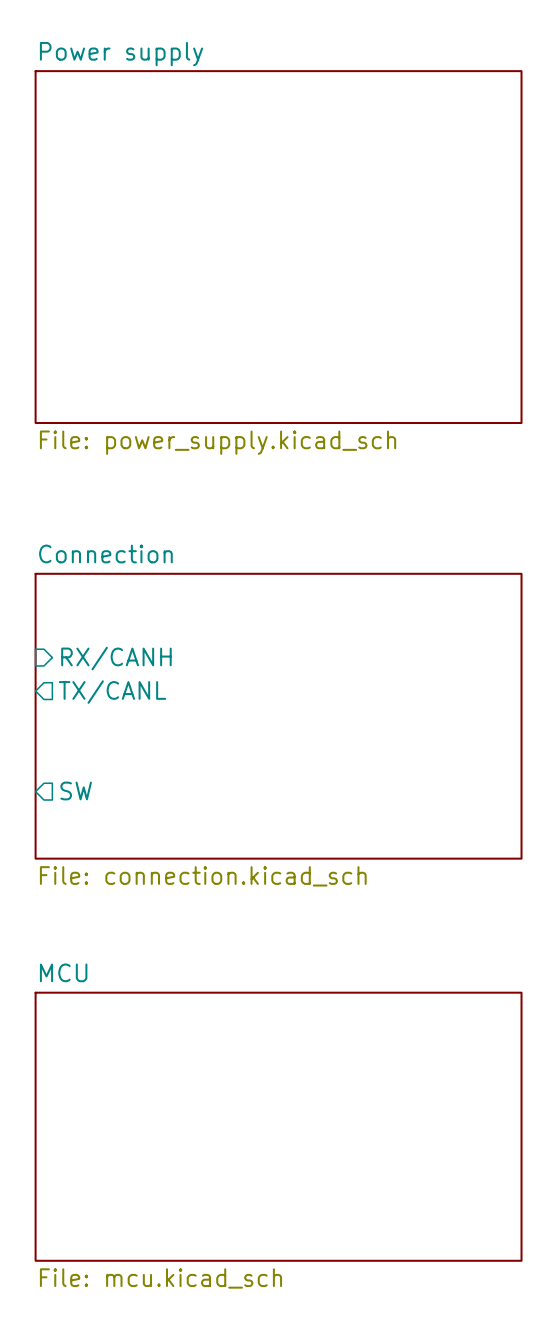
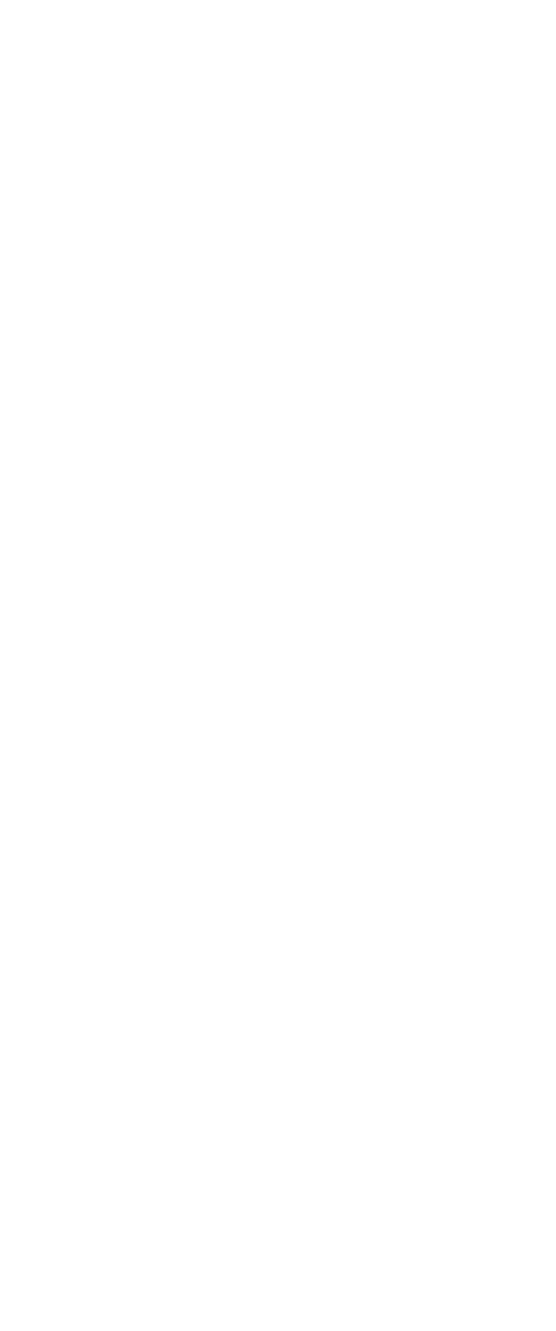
sheet Power supply: File: power_supply.kicad_sch (278, 247) -> none
sheet pin: RX/CANH (116, 658) -> none
sheet pin: TX/CANL (112, 692) -> none
sheet Connection: File: connection.kicad_sch (278, 716) -> none
sheet pin: SW (76, 791) -> none
sheet MCU: File: mcu.kicad_sch (278, 1126) -> none

